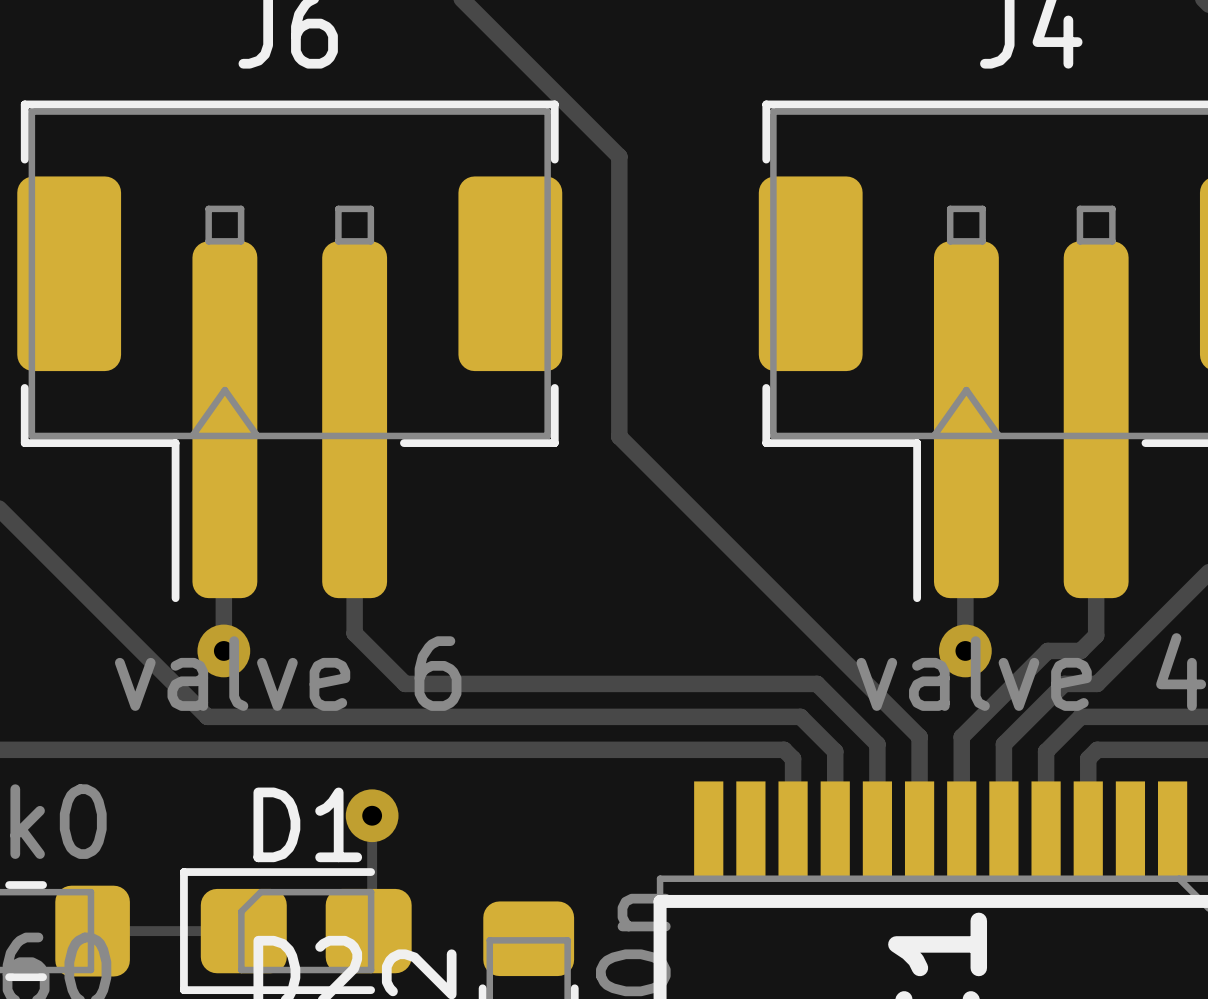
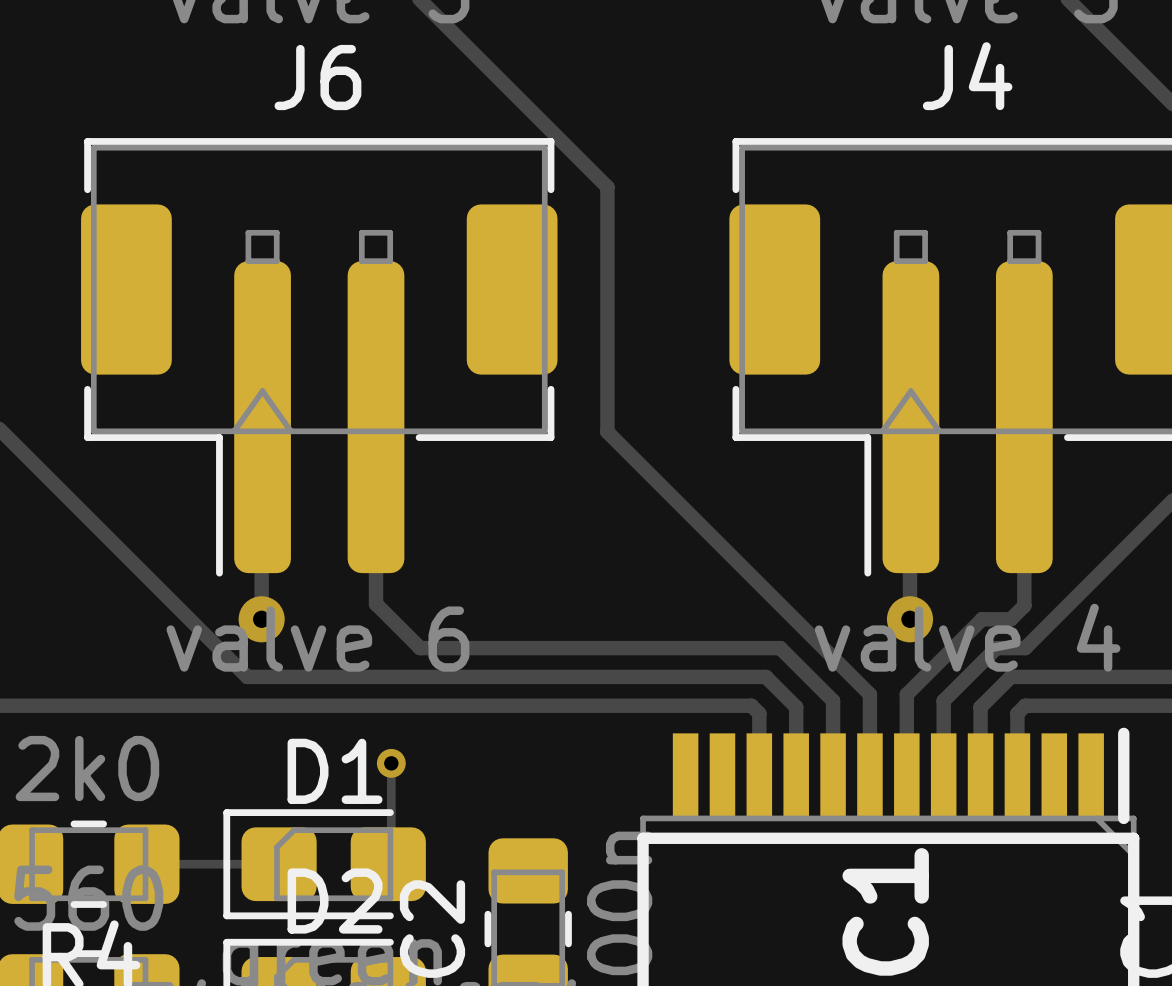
via size: [345, 789, 399, 843] -> [376, 748, 406, 778]

